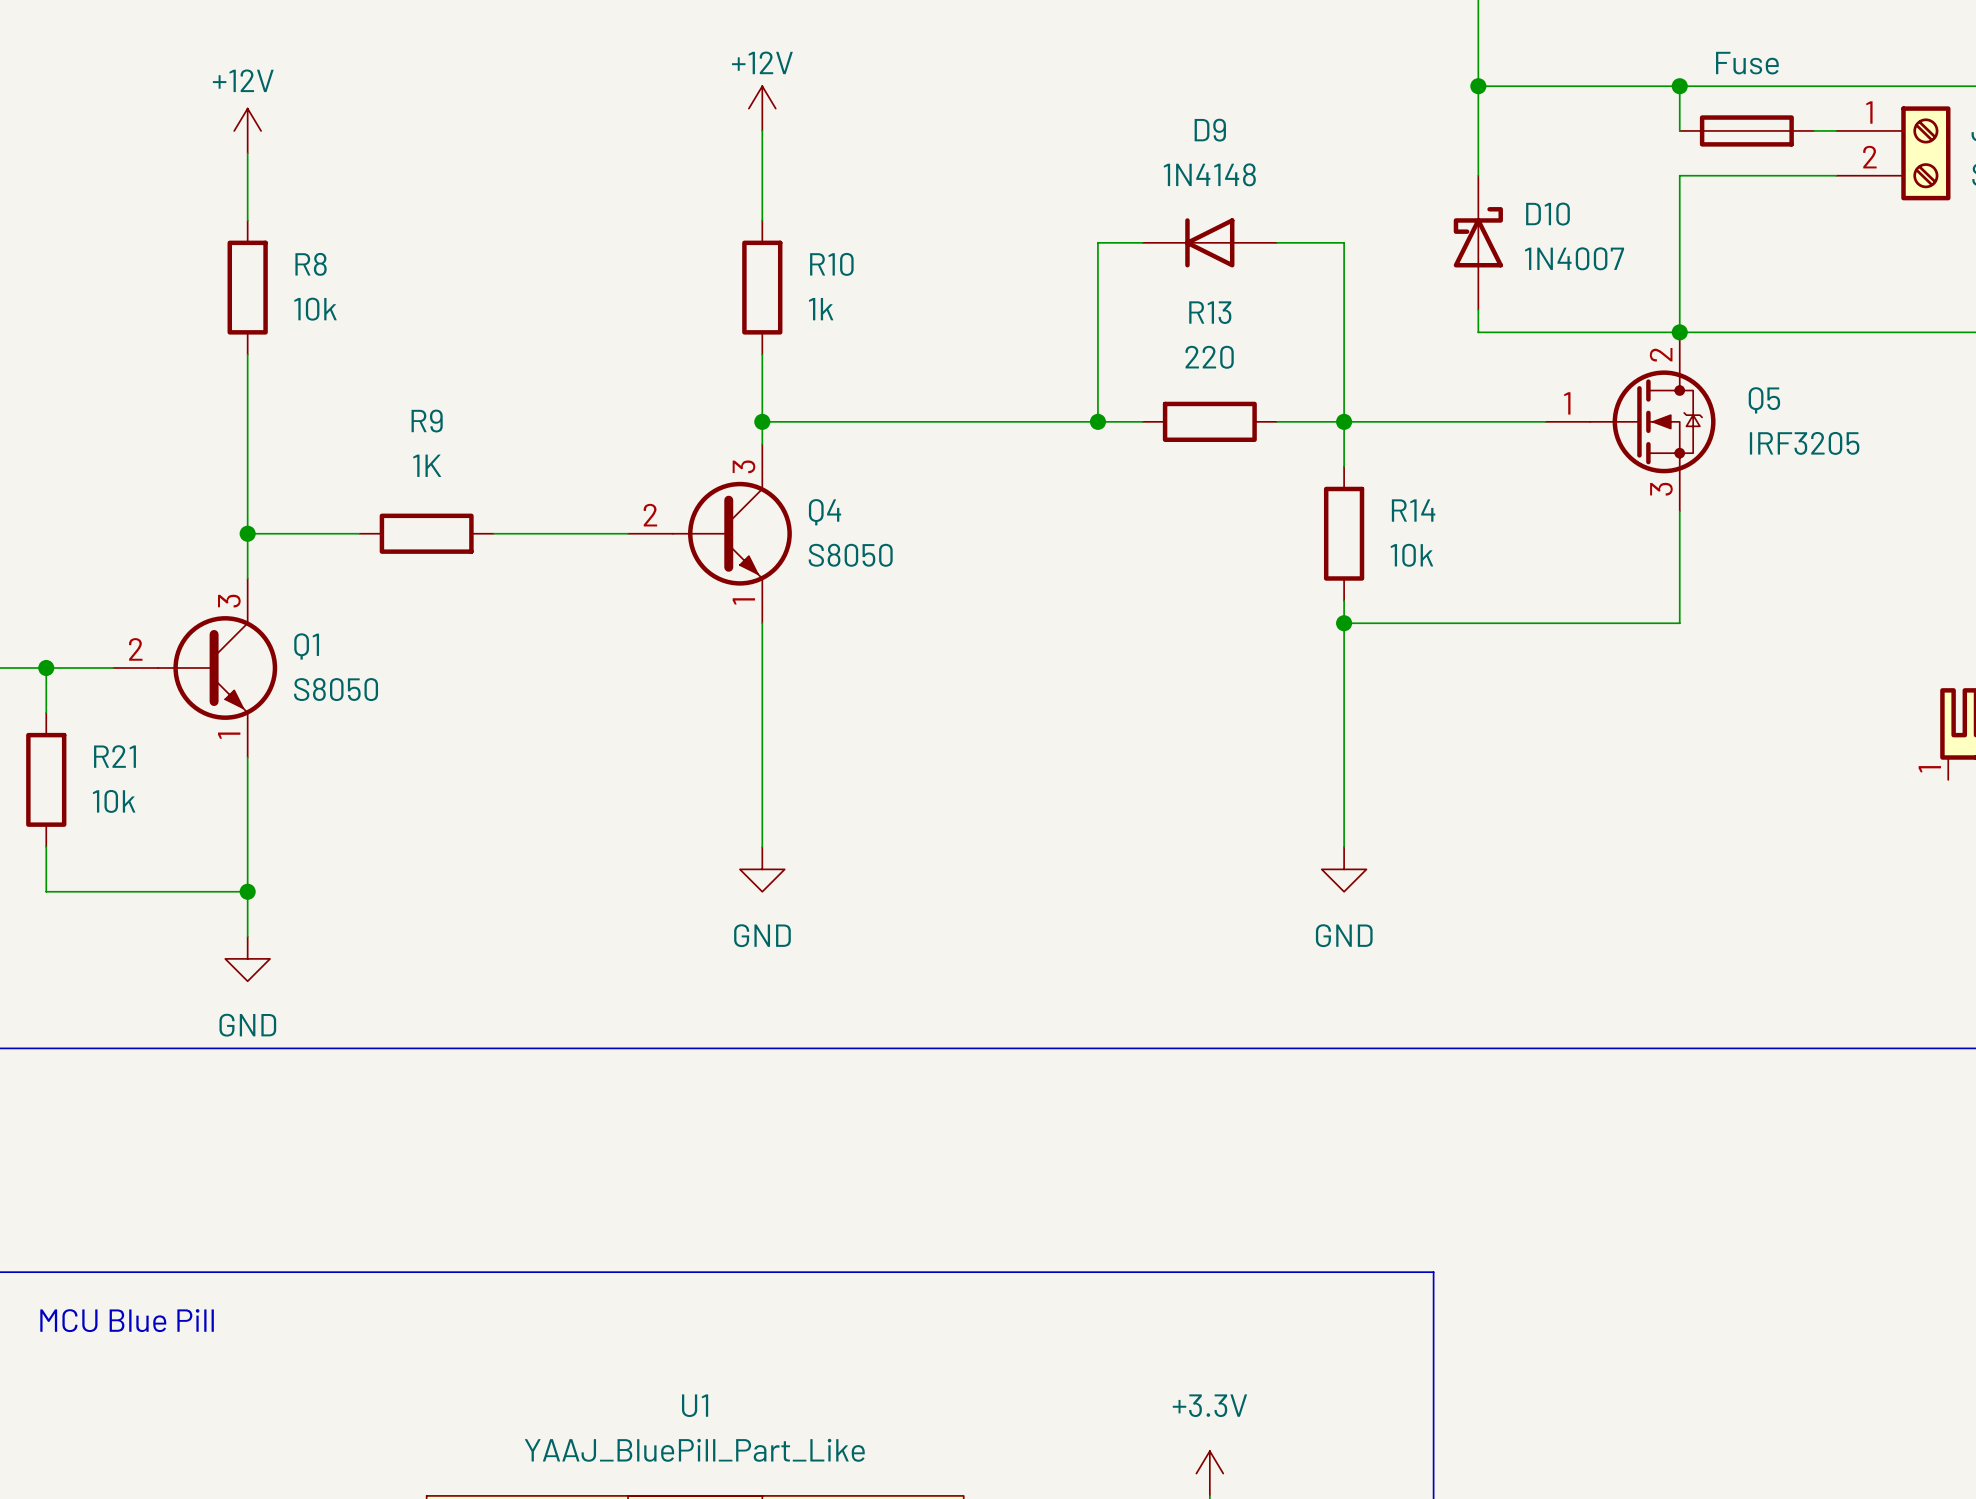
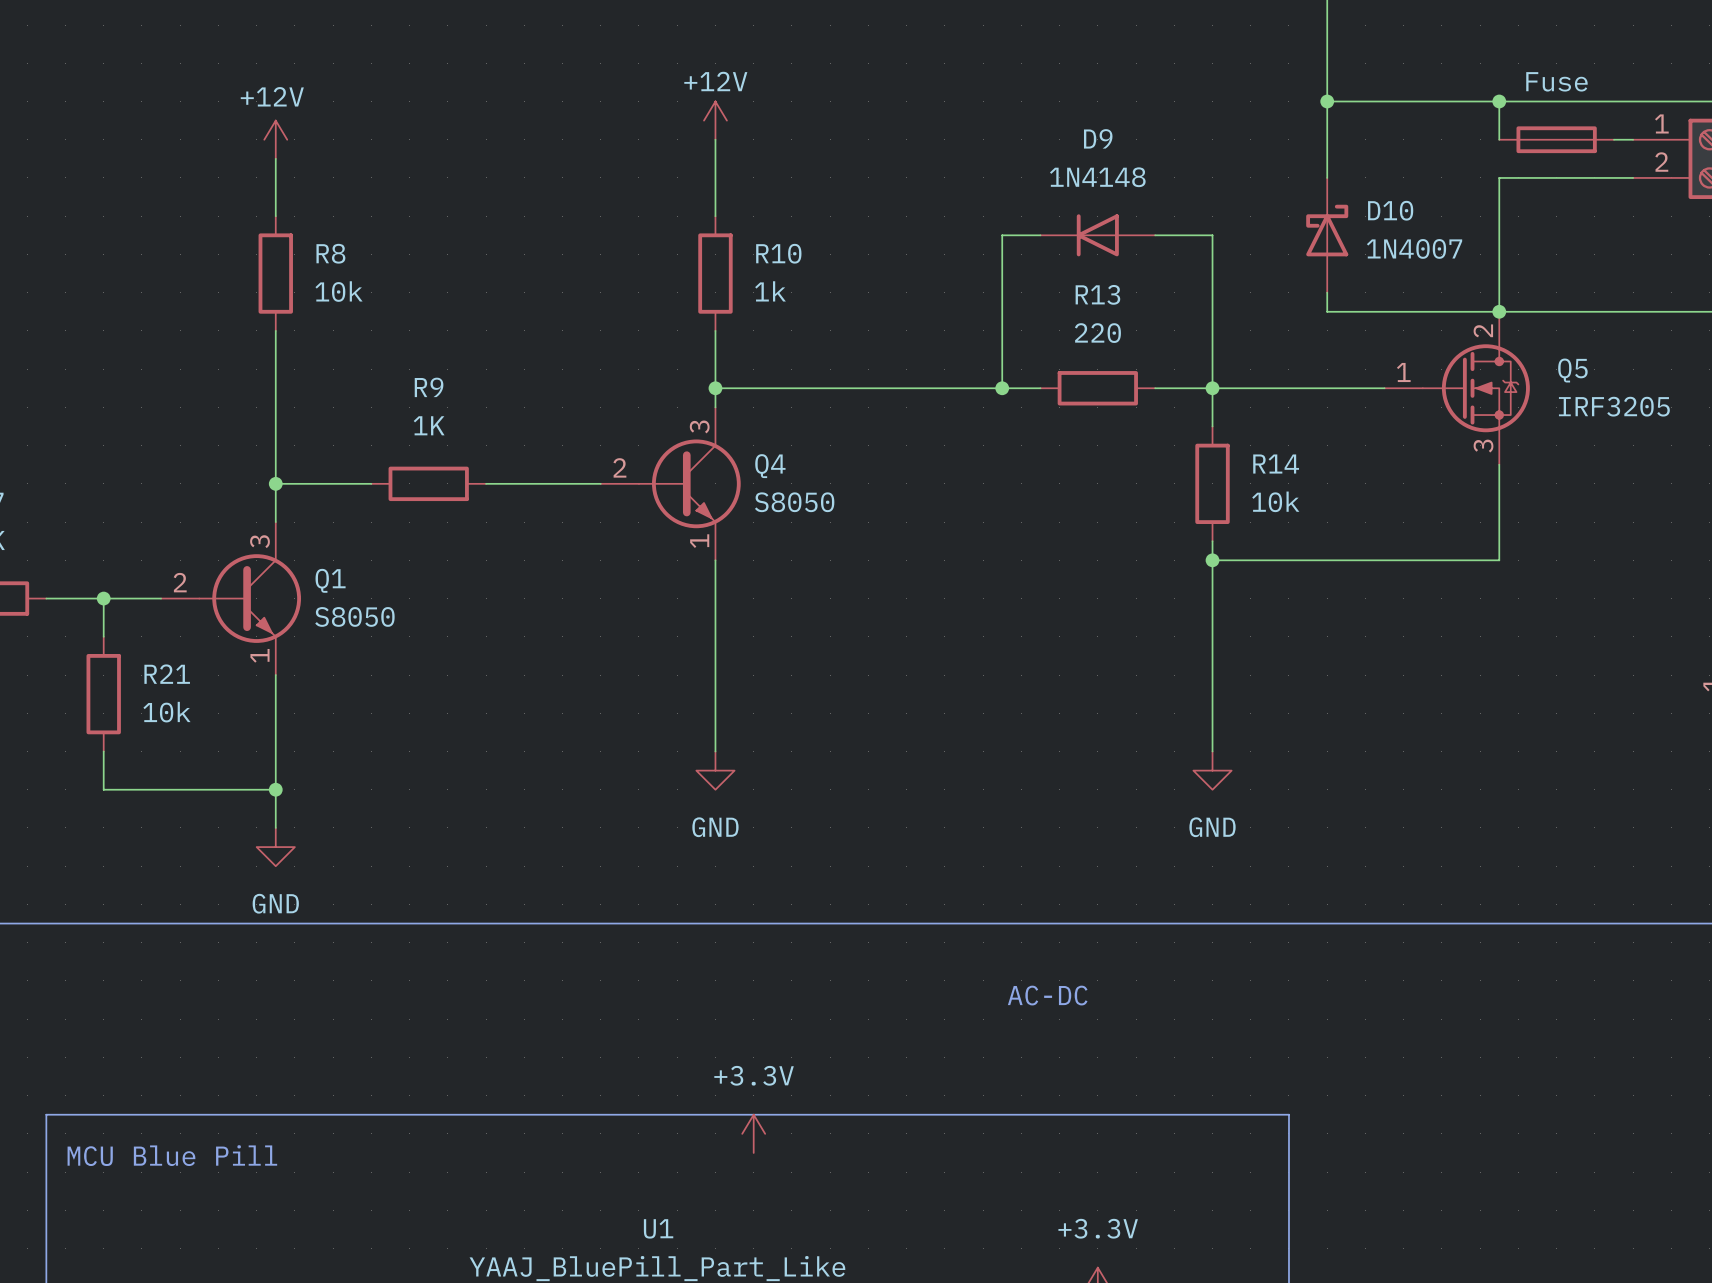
text: none -> AC-DC (1047, 995)
power symbol: none -> +3.3V (753, 1133)

